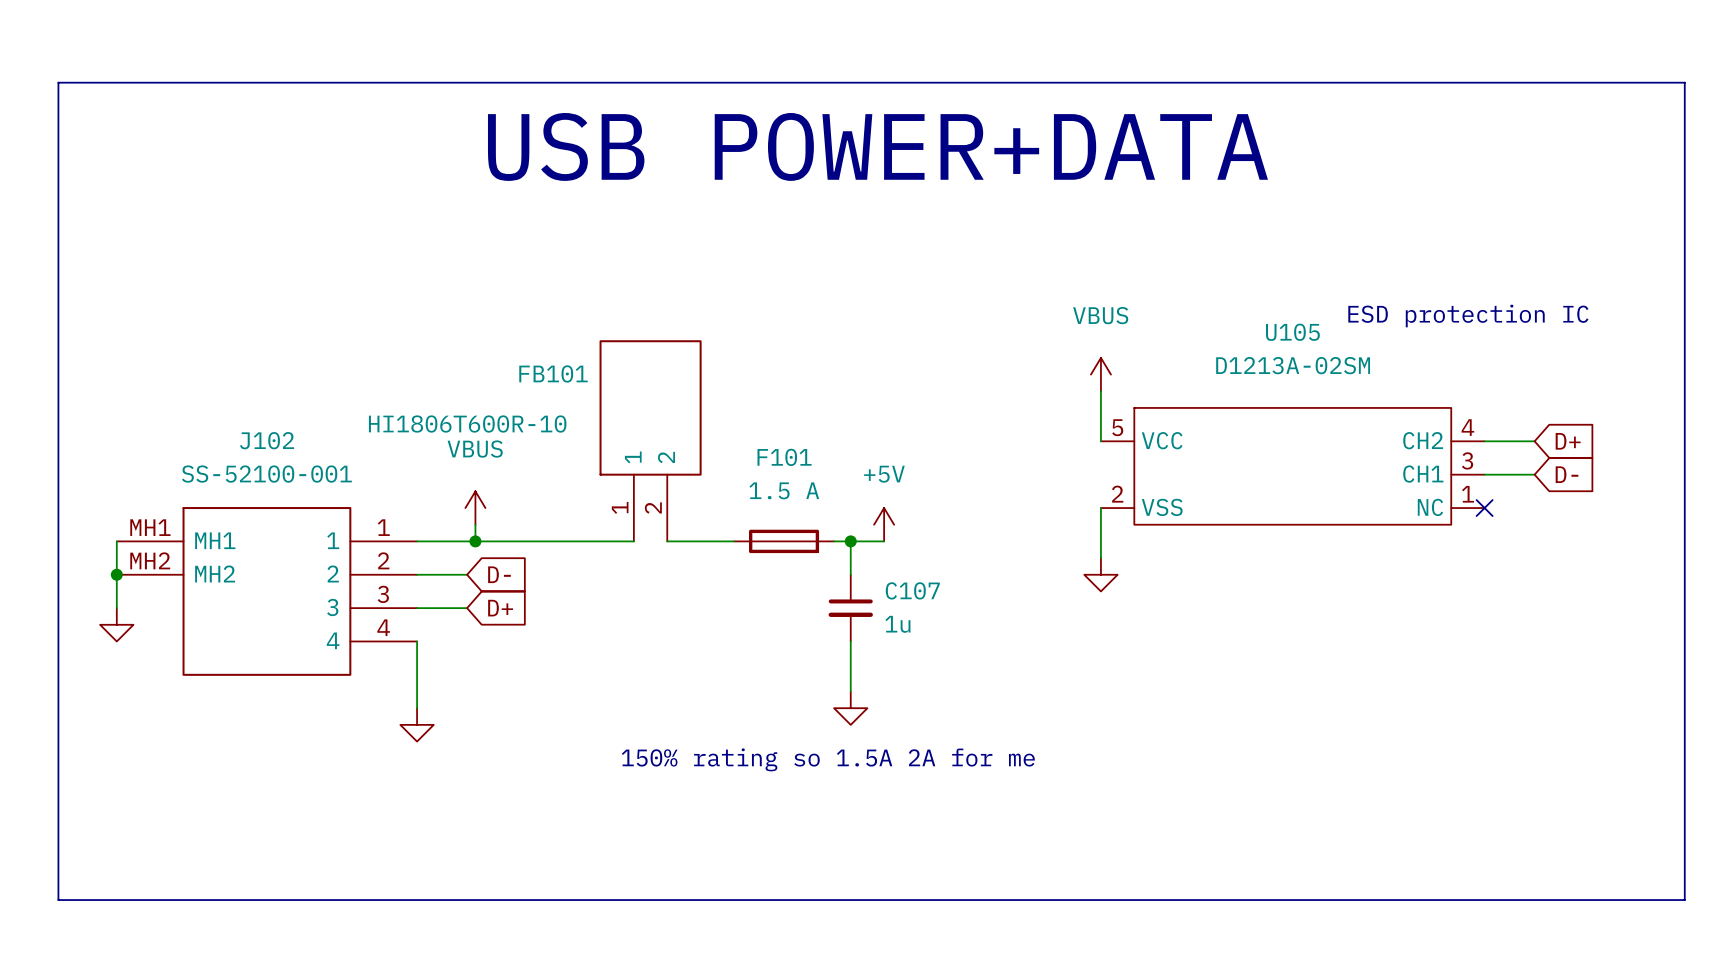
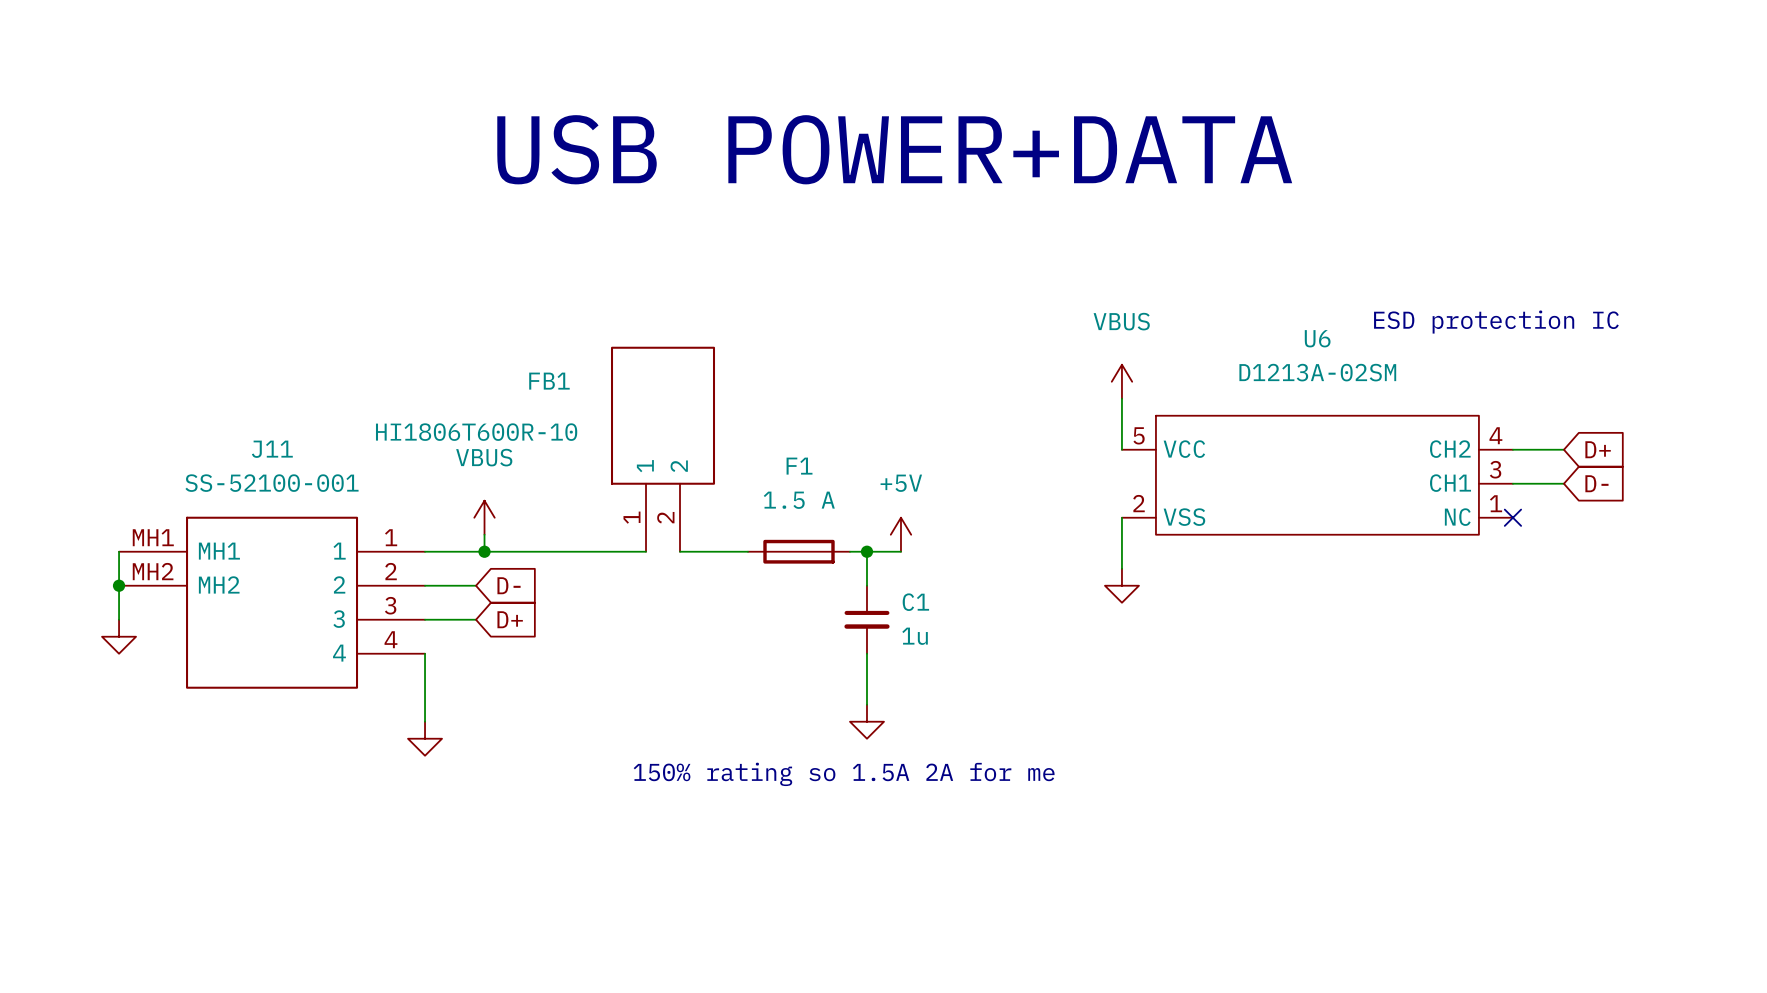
line: (58, 82) (1684, 82) (1684, 900) (58, 900) (58, 82) -> none
U105 name: U105 (1292, 332) -> U6 (1317, 338)
FB101 name: FB101 (553, 373) -> FB1 (549, 381)
J102 name: J102 (267, 440) -> J11 (272, 449)
F101 name: F101 (784, 457) -> F1 (799, 466)
C107 name: C107 (912, 590) -> C1 (915, 602)

